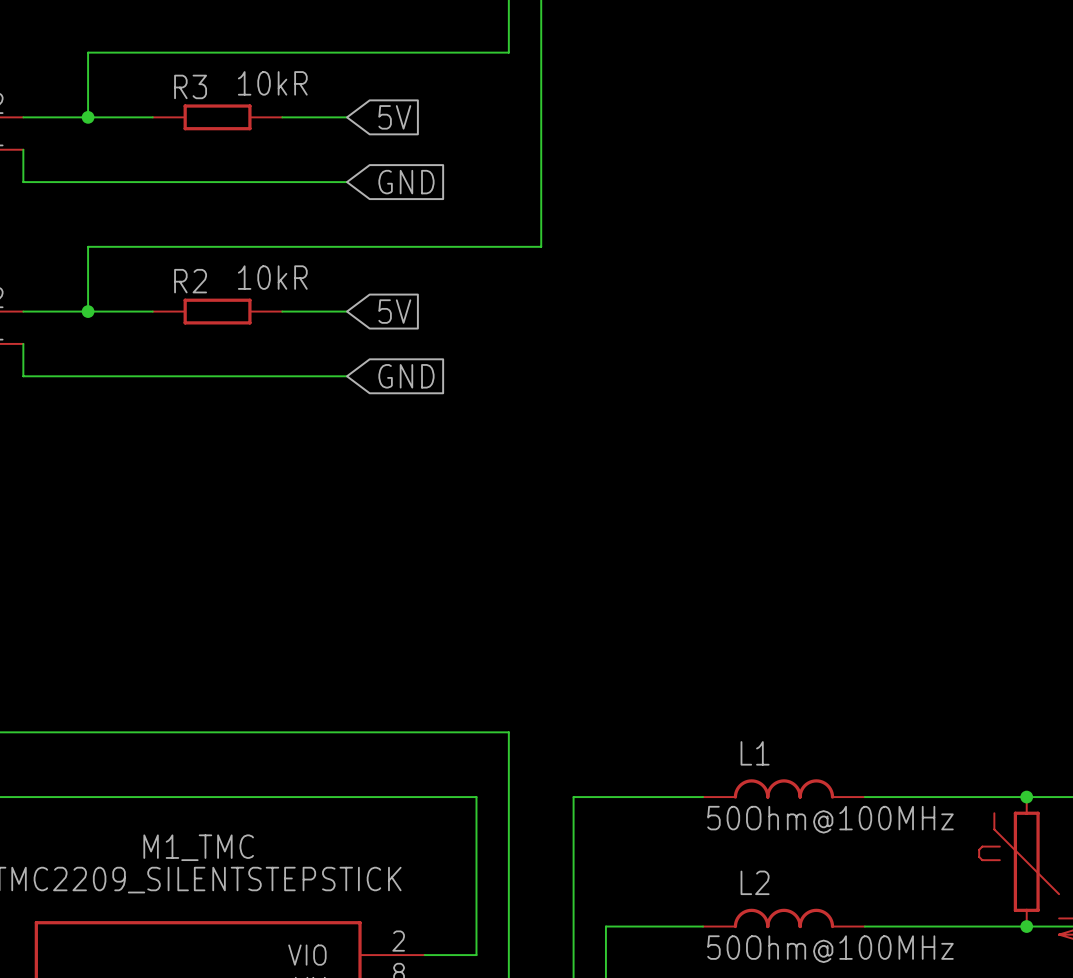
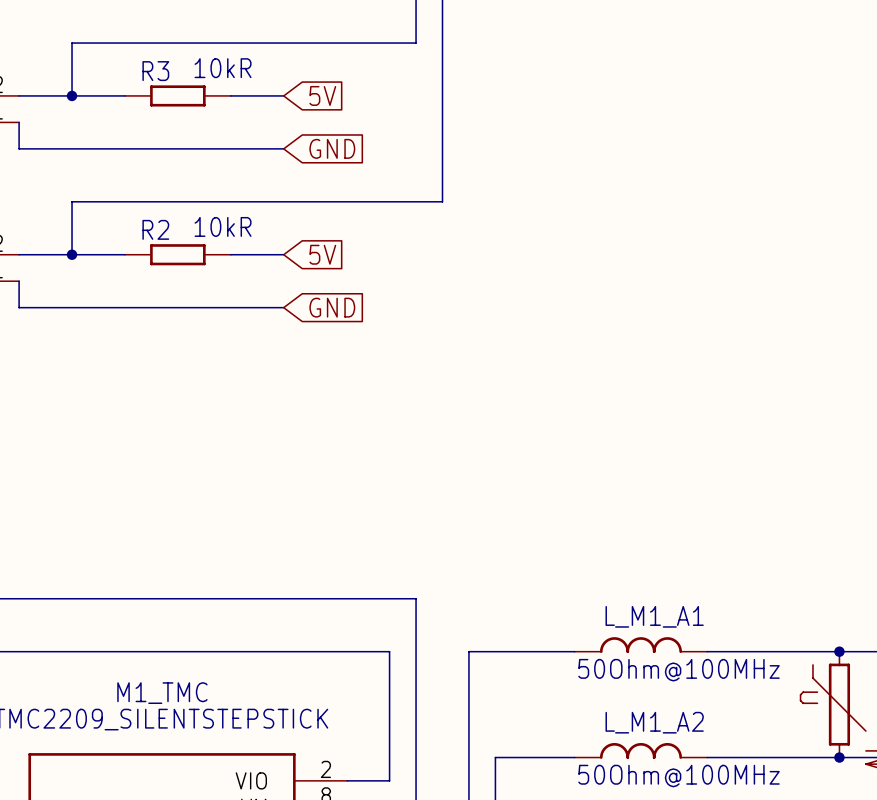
L1 name: L1 (755, 753) -> L_M1_A1 (654, 616)
L2 name: L2 (755, 882) -> L_M1_A2 (654, 722)

